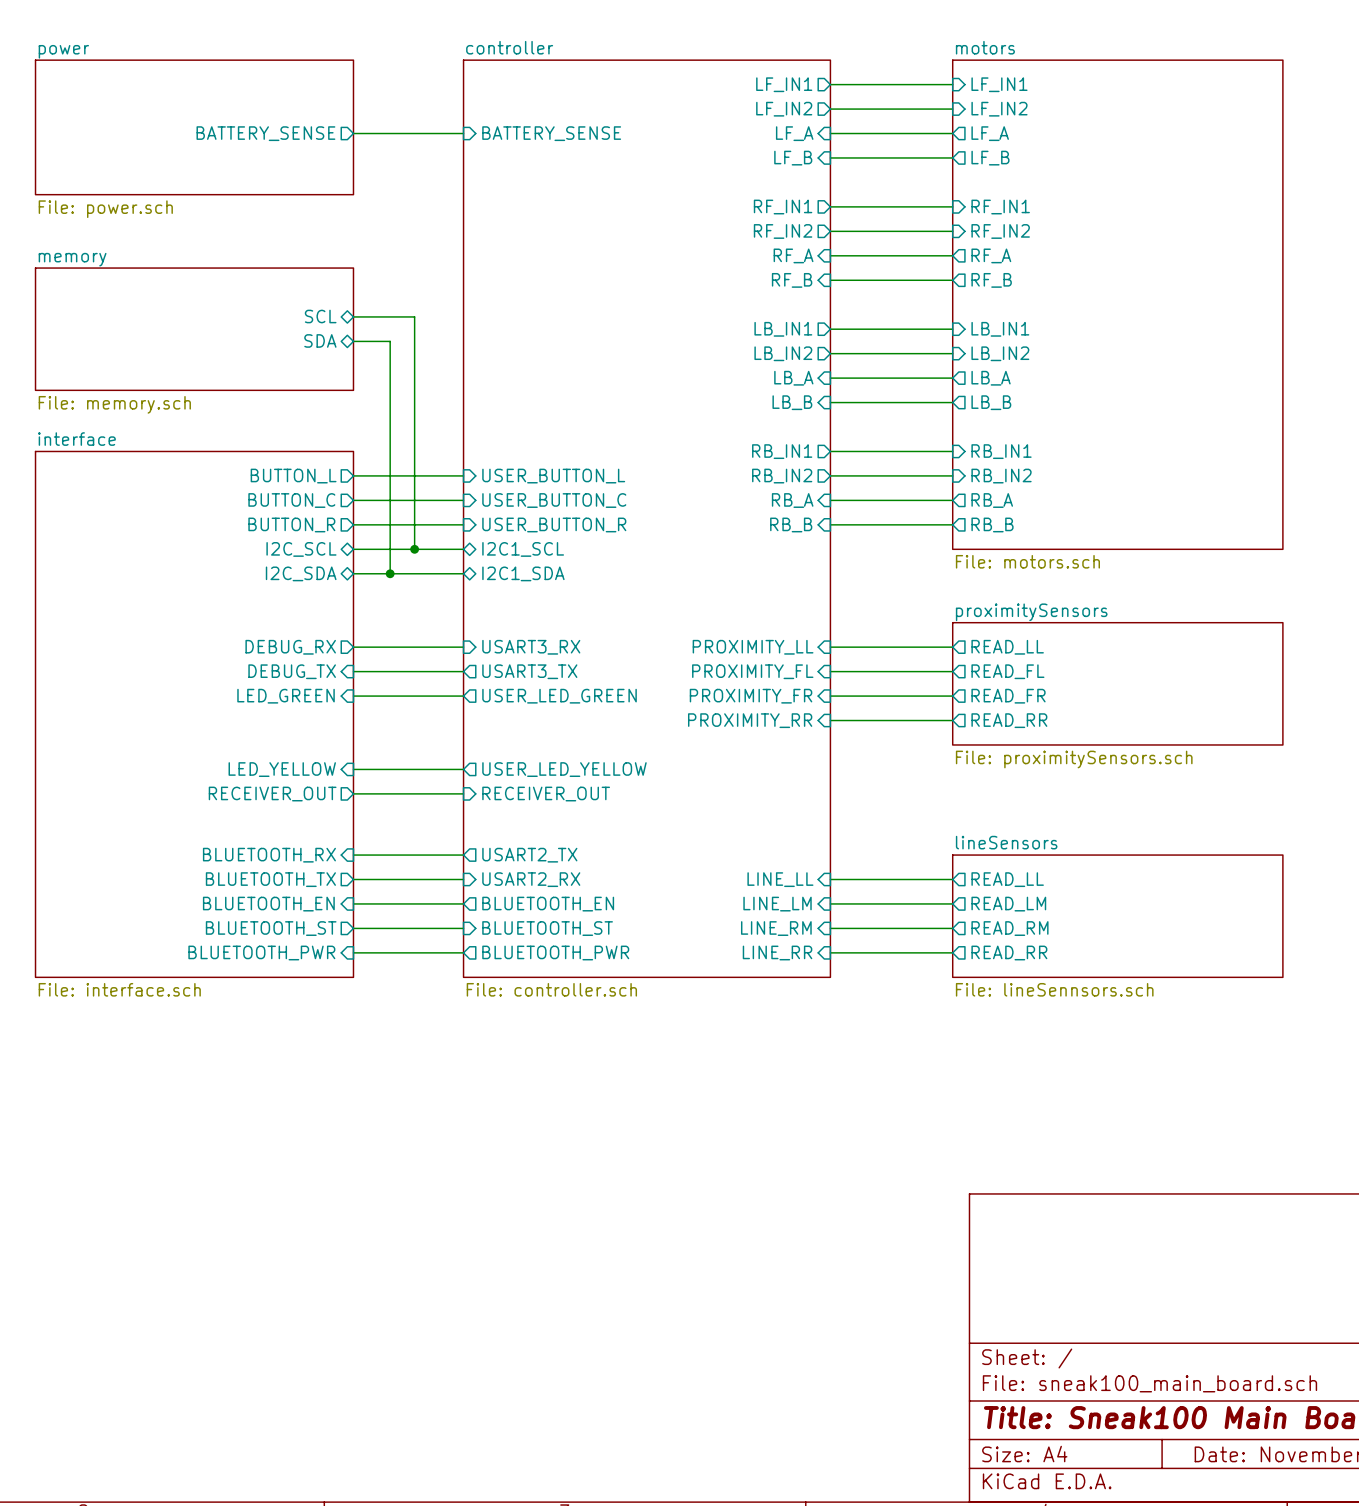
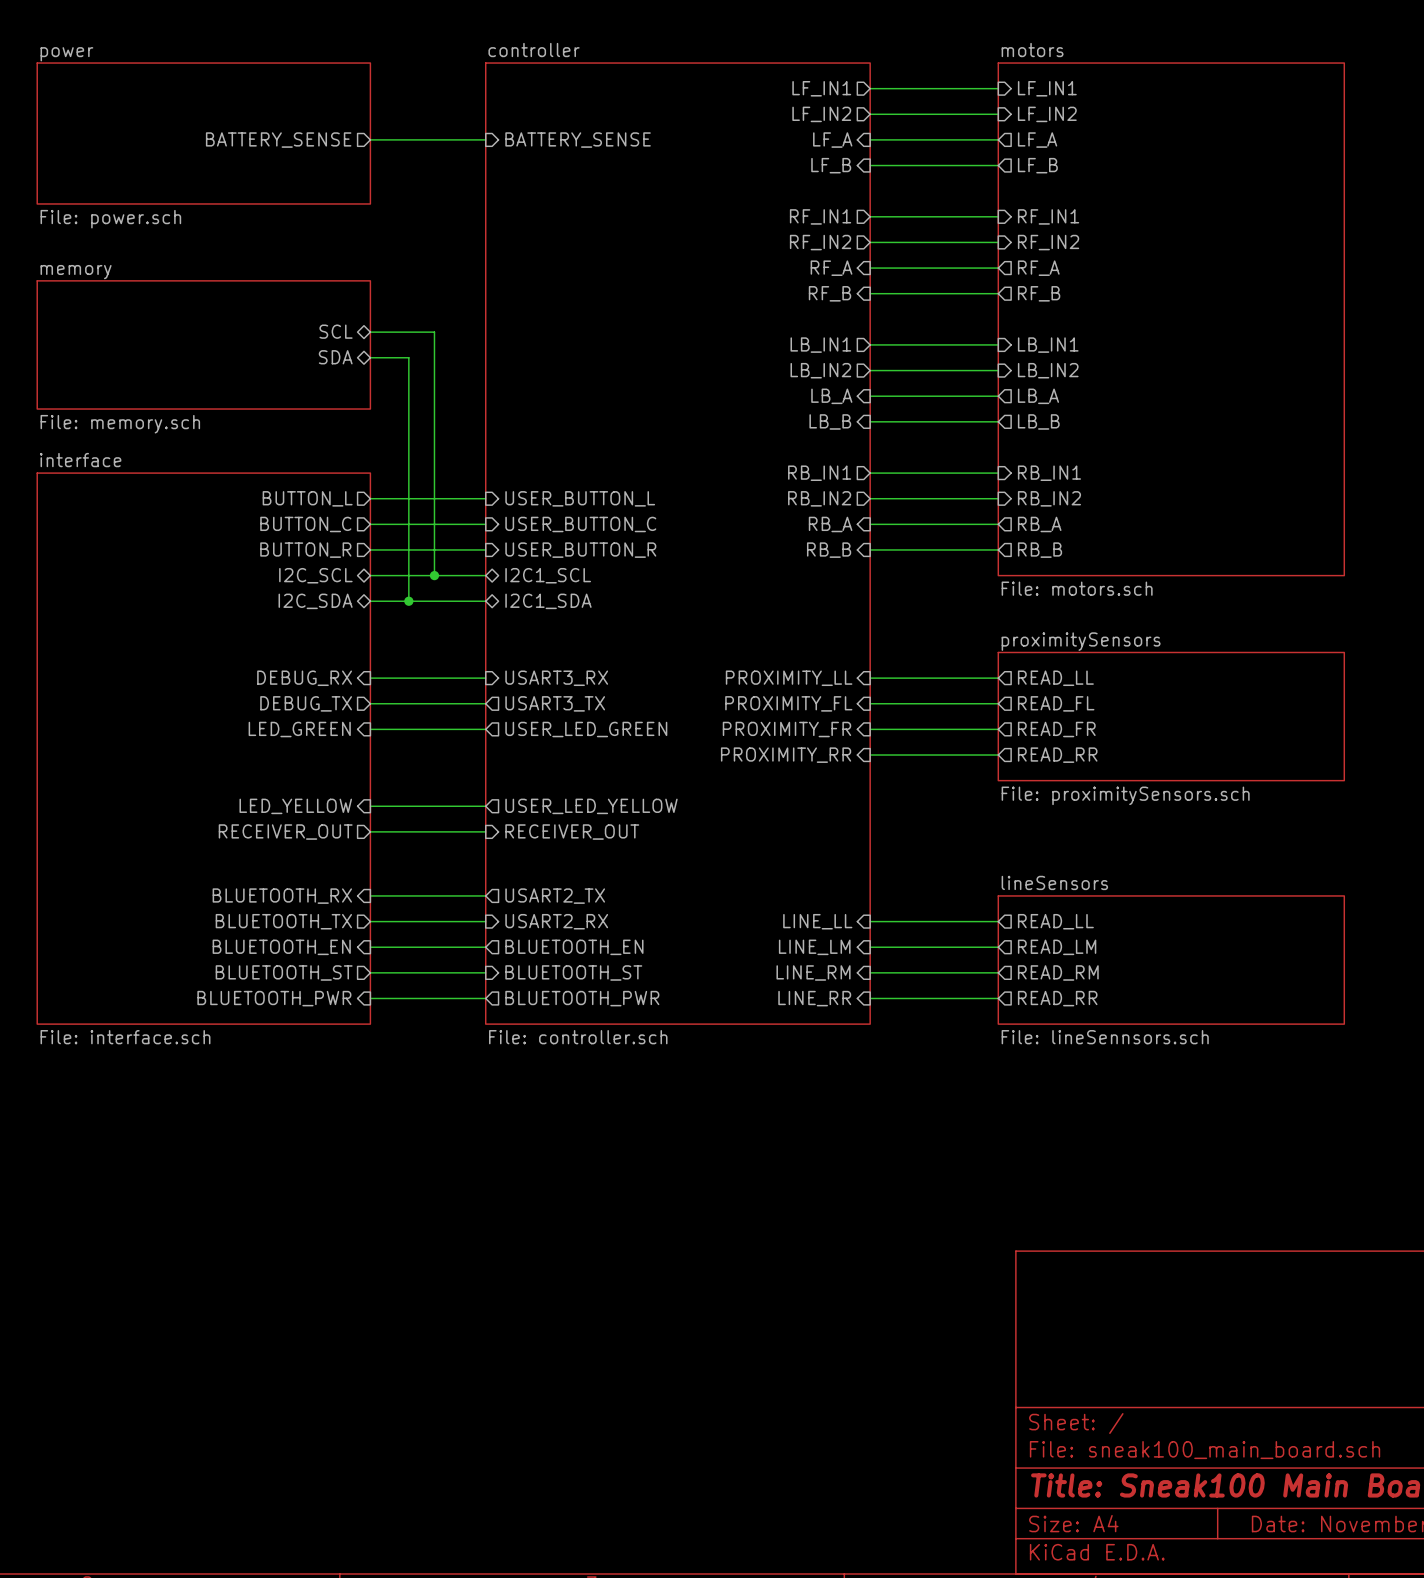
sheet pin shape: output (290, 647) -> input (304, 678)
sheet pin shape: input (292, 671) -> output (306, 703)

